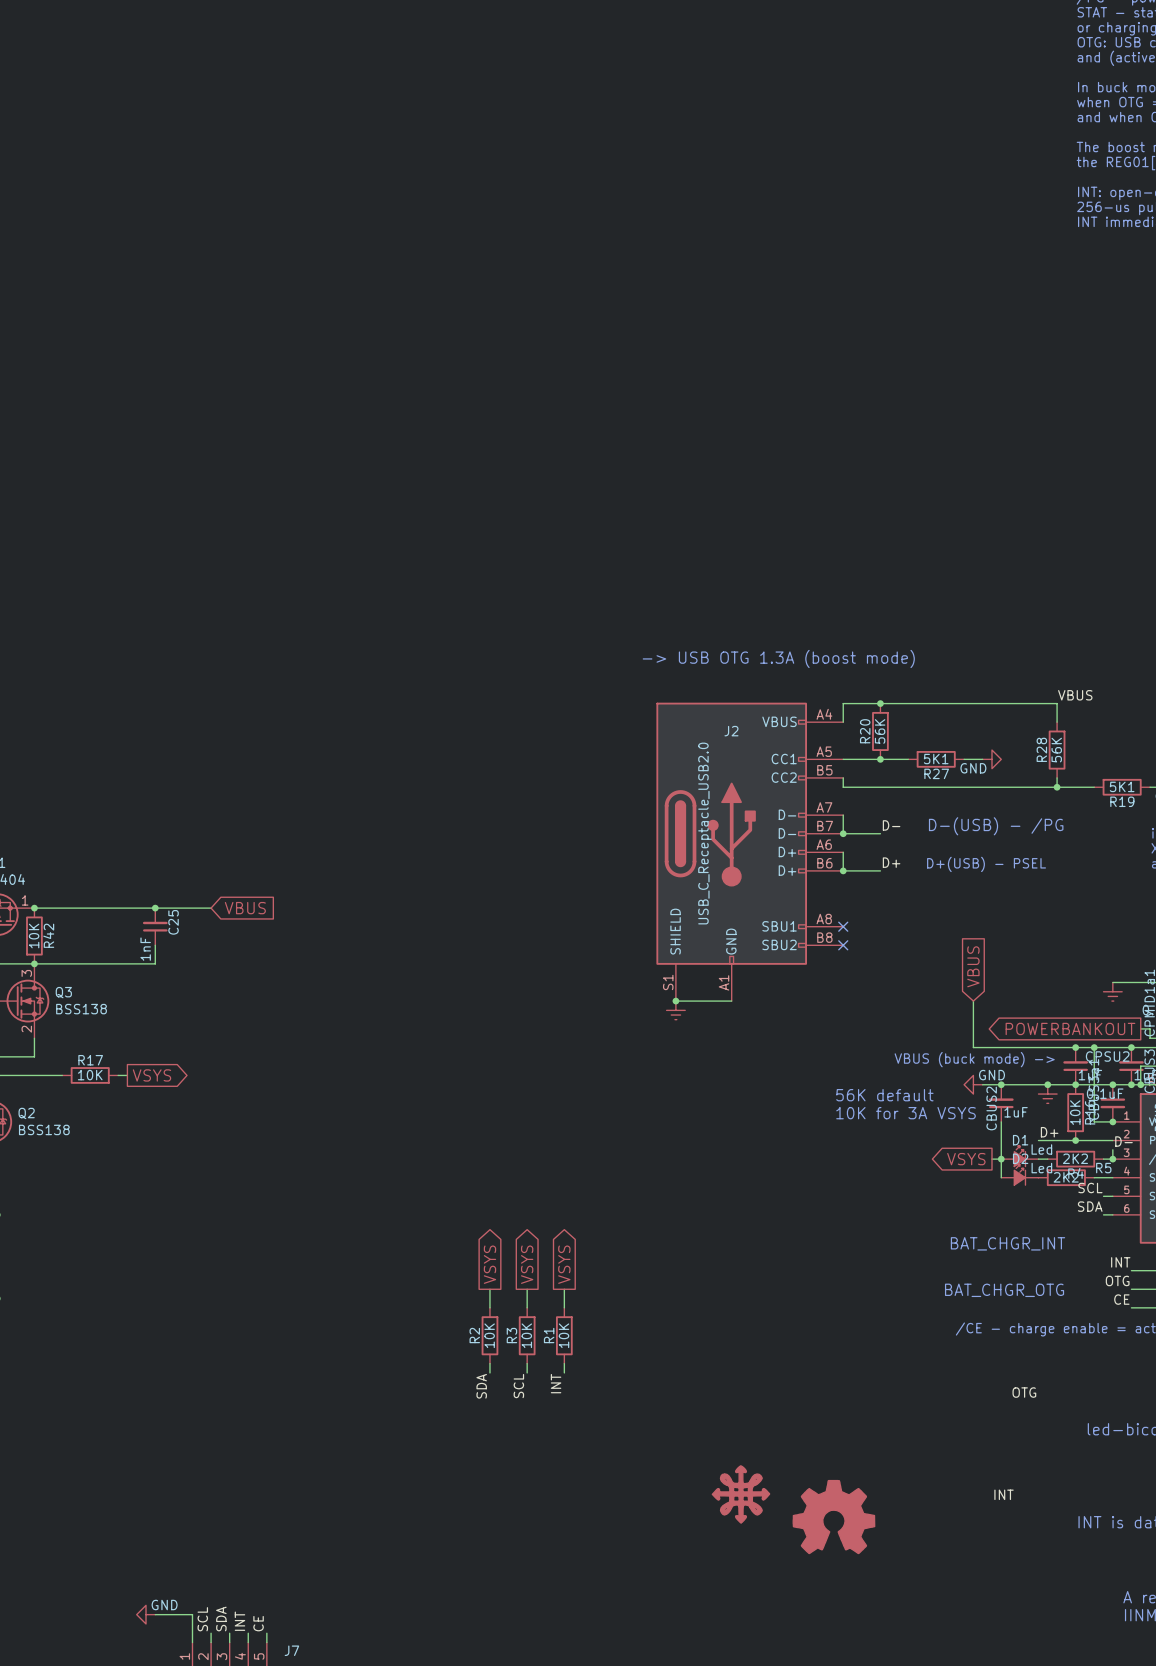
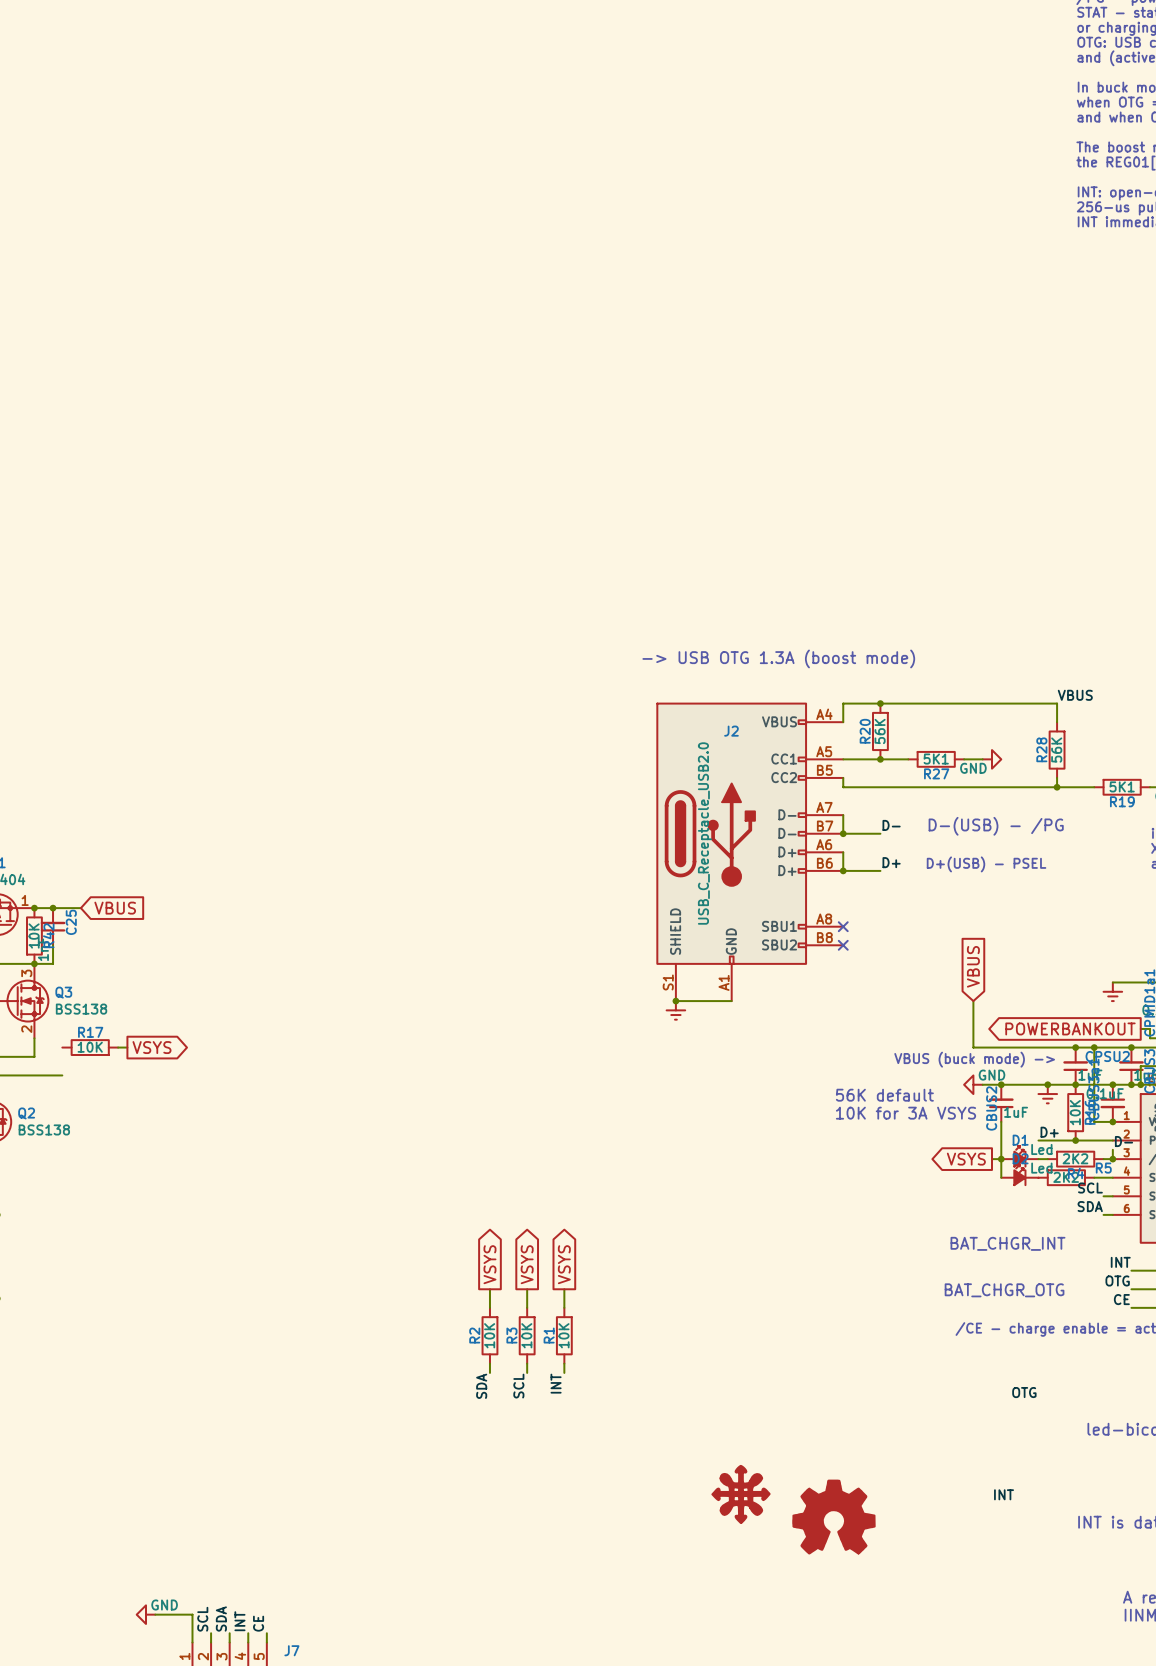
junction: none -> (53, 908)
wire: (80, 908) (211, 908) -> none
junction: (155, 908) -> none
global label position: VBUS (245, 908) -> VBUS (115, 908)
C25 position: (155, 926) -> (53, 926)
wire: (155, 945) (155, 963) (53, 963) -> (53, 945) (53, 963)
R17 position: (90, 1075) -> (90, 1047)
wire: (118, 1075) (127, 1075) -> (118, 1047) (127, 1047)
global label position: VSYS (151, 1075) -> VSYS (151, 1047)

